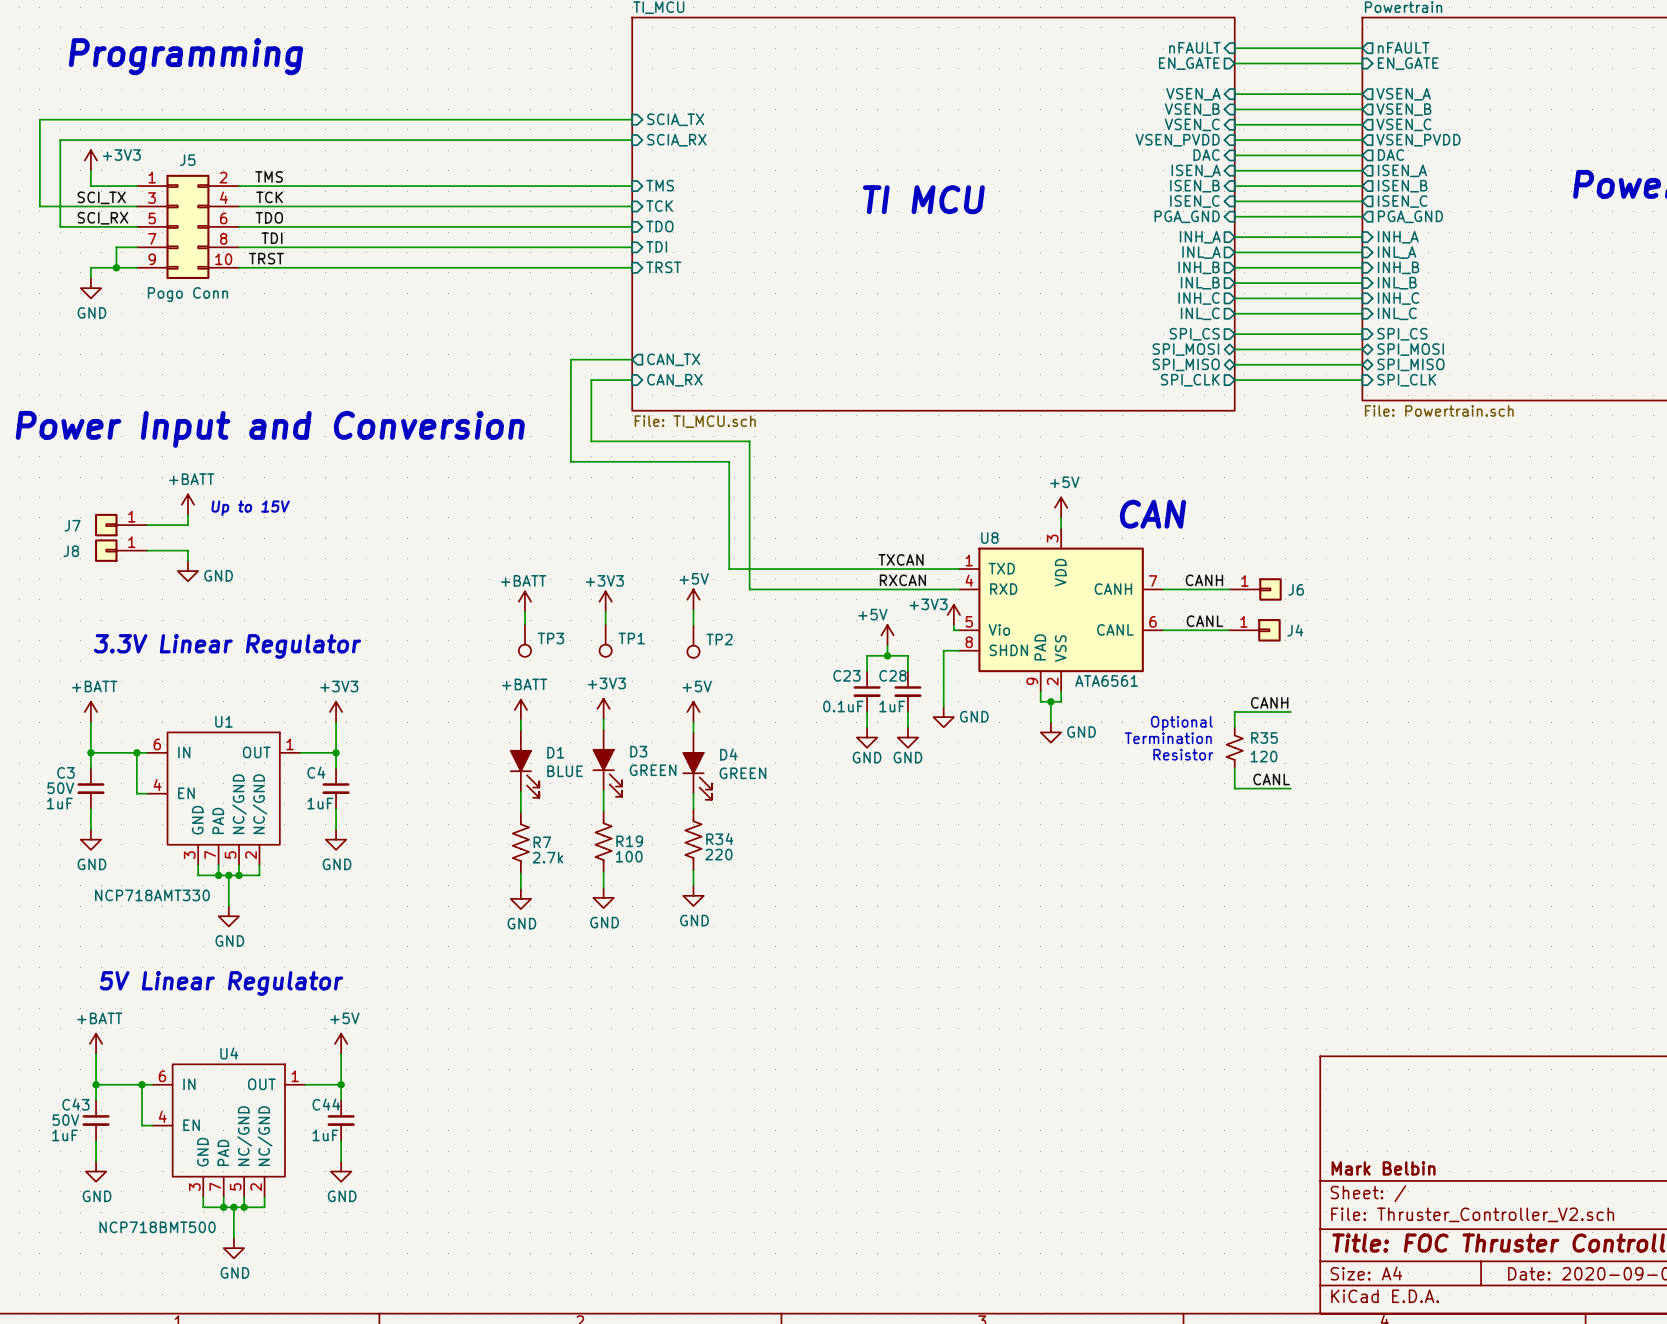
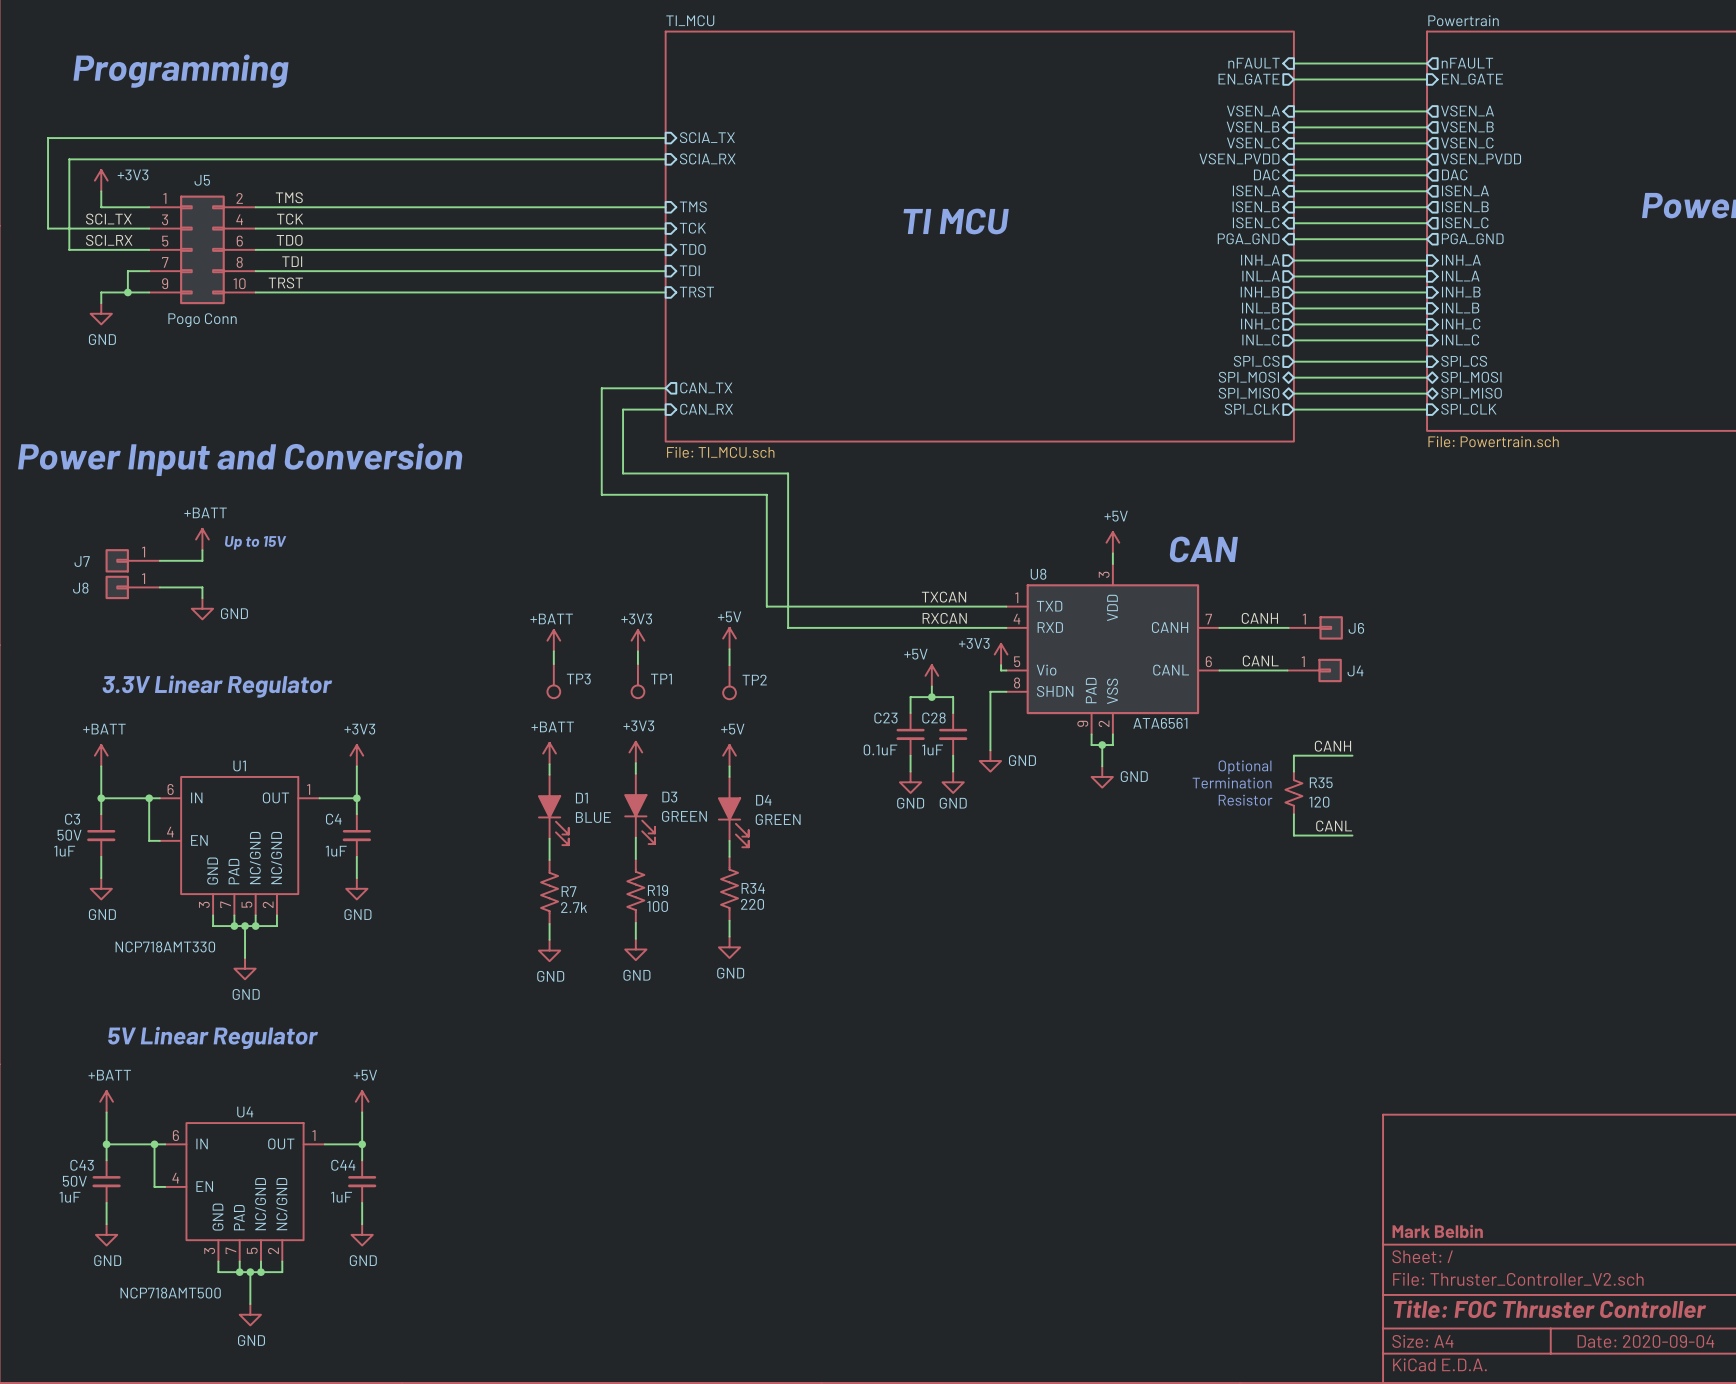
U4 value: NCP718BMT500 (157, 1227) -> NCP718AMT500 (170, 1293)

